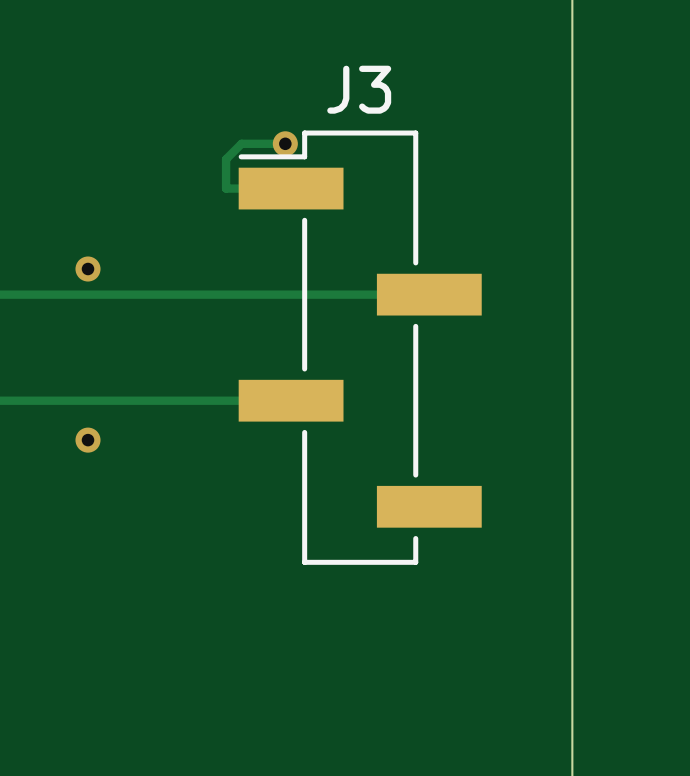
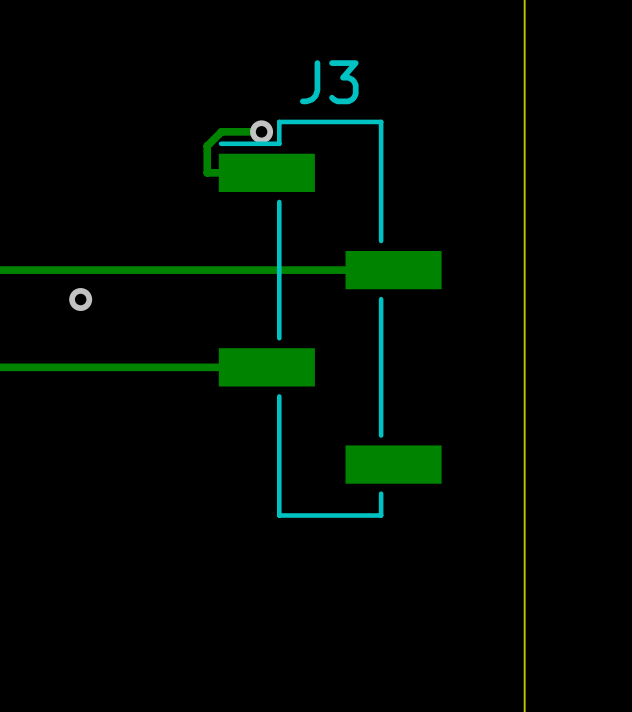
via: (88, 269) -> none
via: none -> (80, 299)
via: (88, 440) -> none

